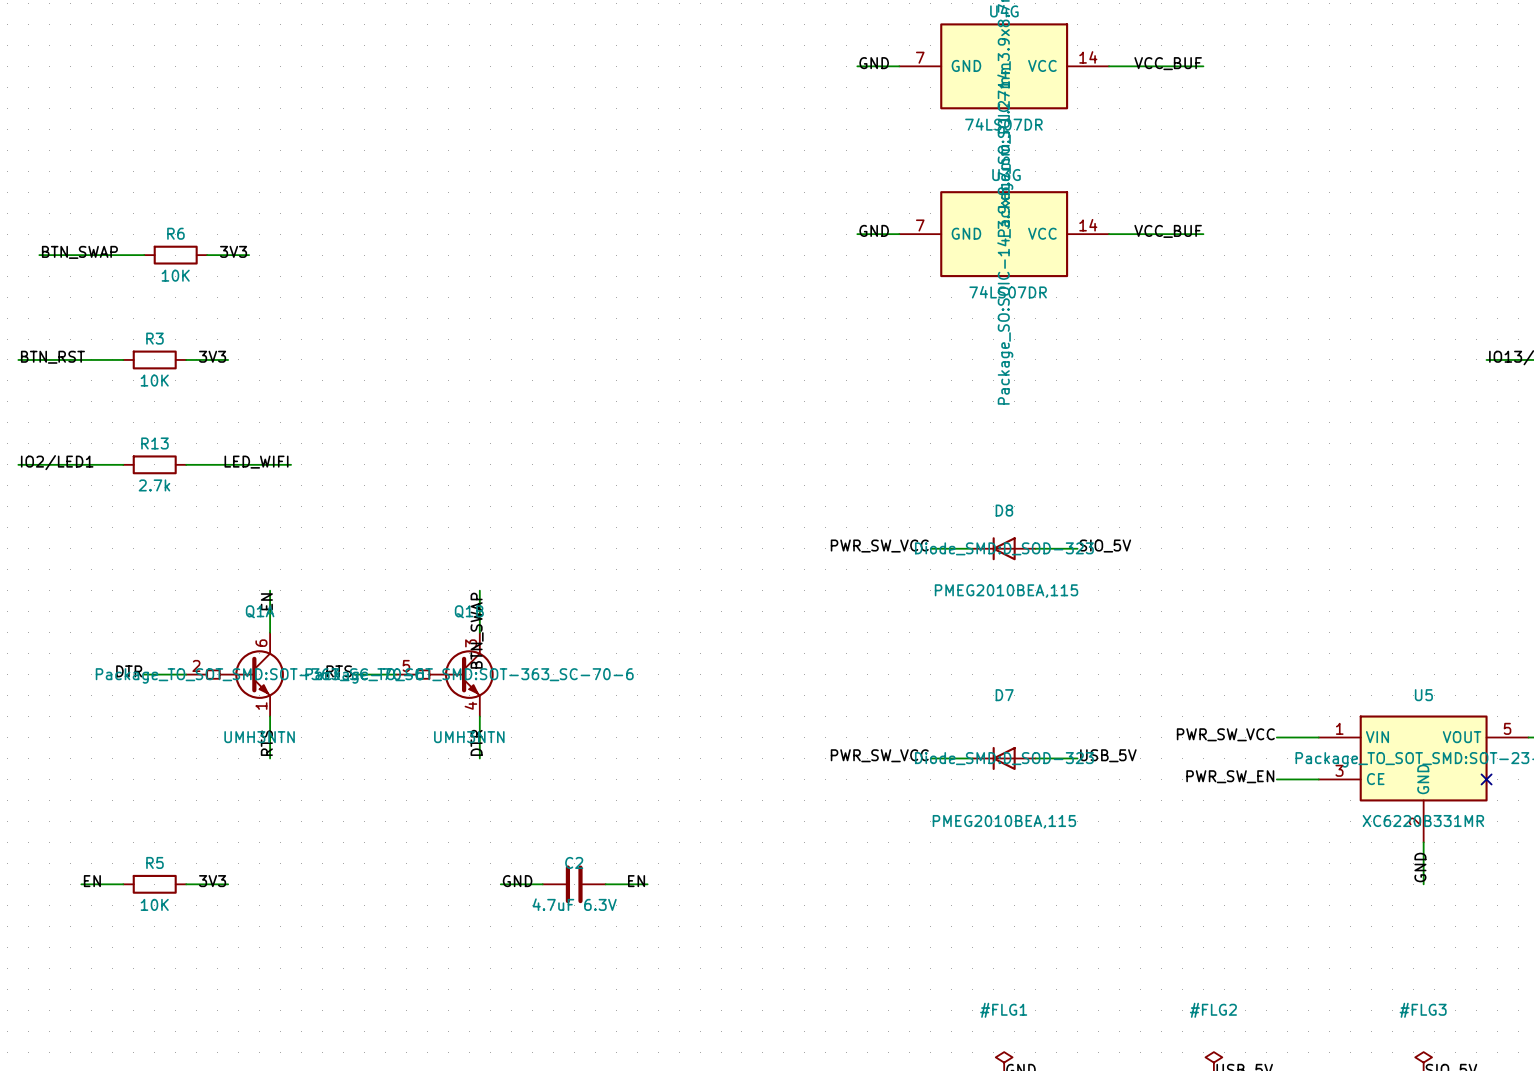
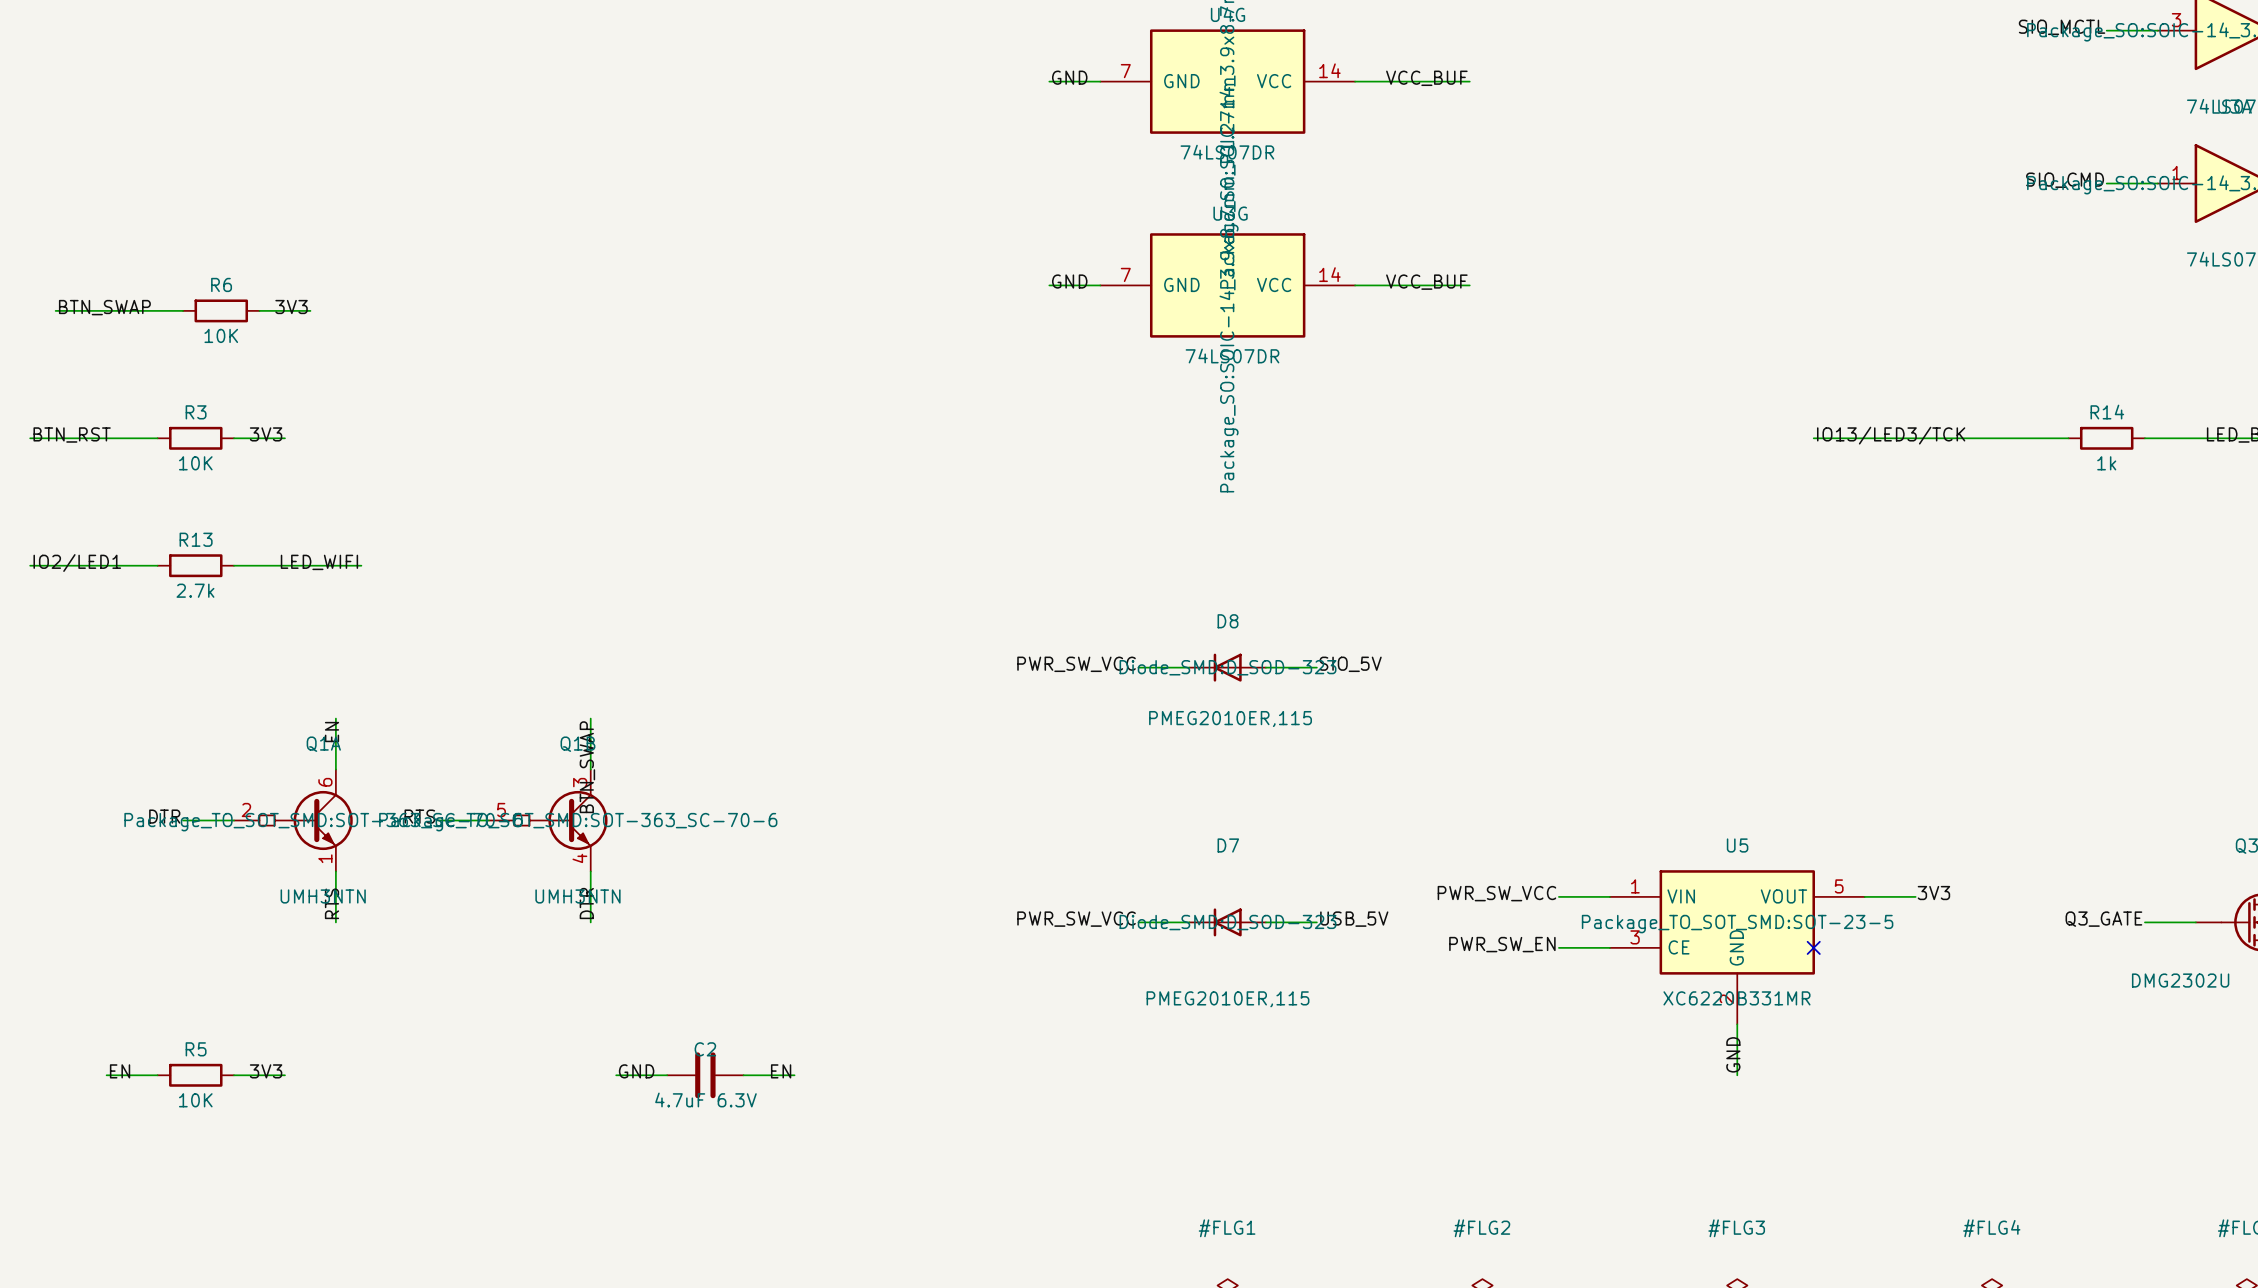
D8 value: PMEG2010BEA,115 (1006, 591) -> PMEG2010ER,115 (1230, 719)
D7 value: PMEG2010BEA,115 (1004, 821) -> PMEG2010ER,115 (1228, 999)

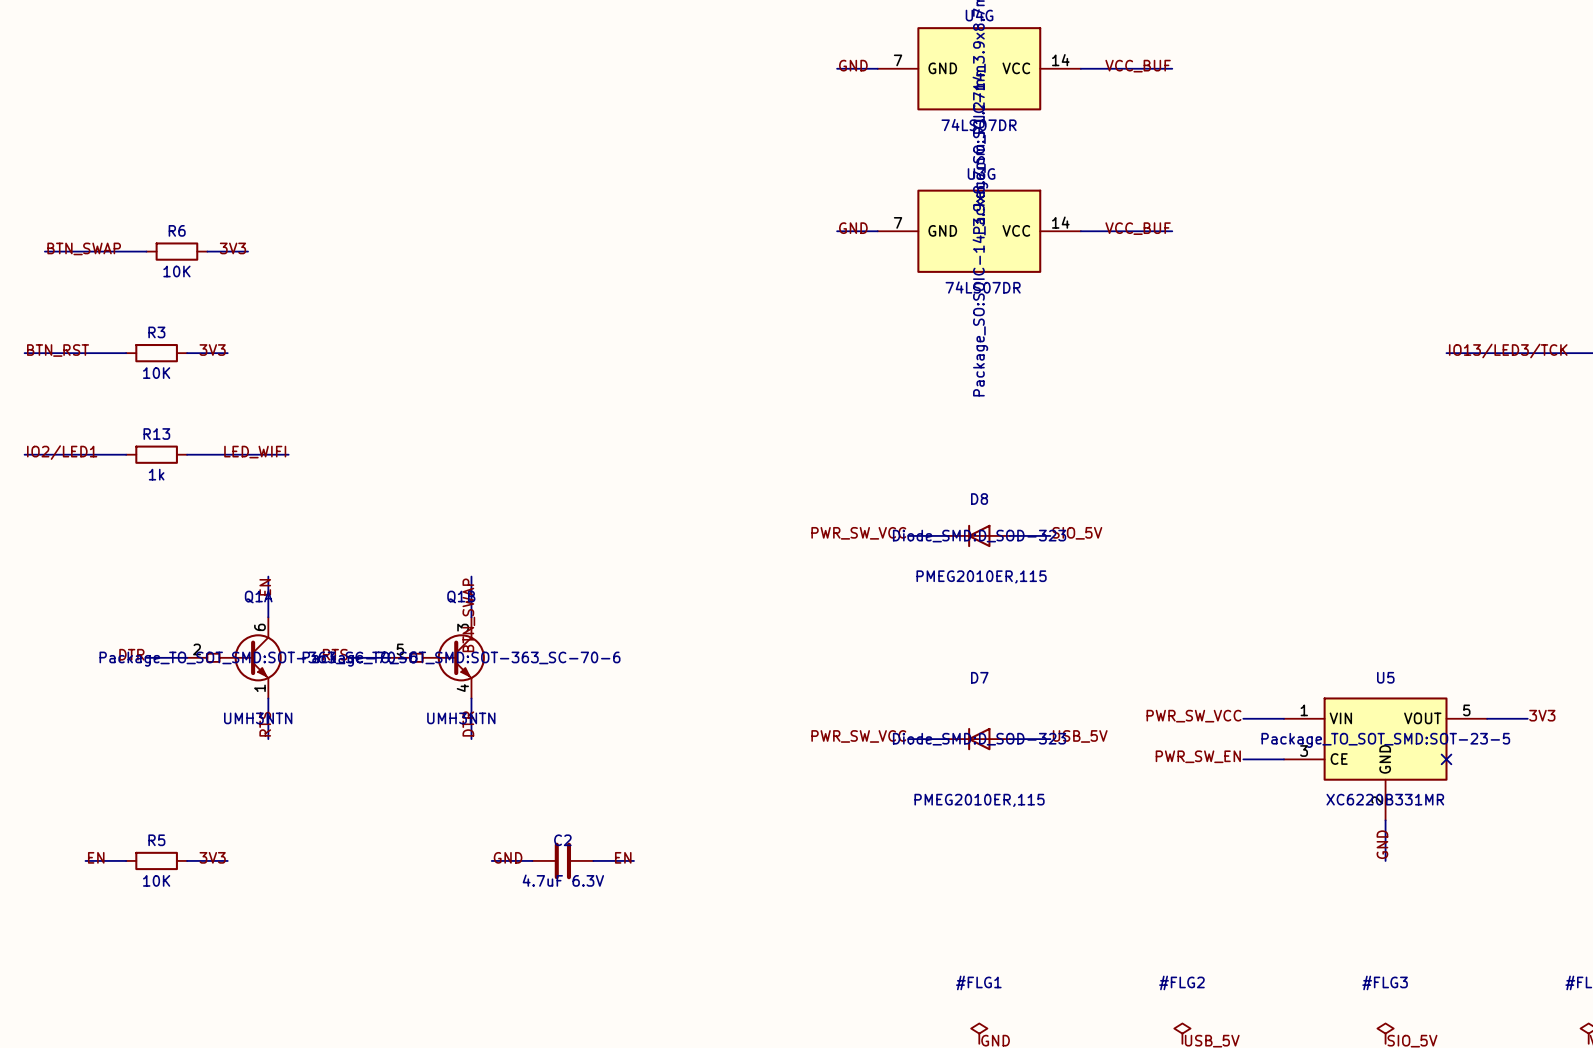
R13 value: 2.7k (195, 590) -> 1k (156, 474)

